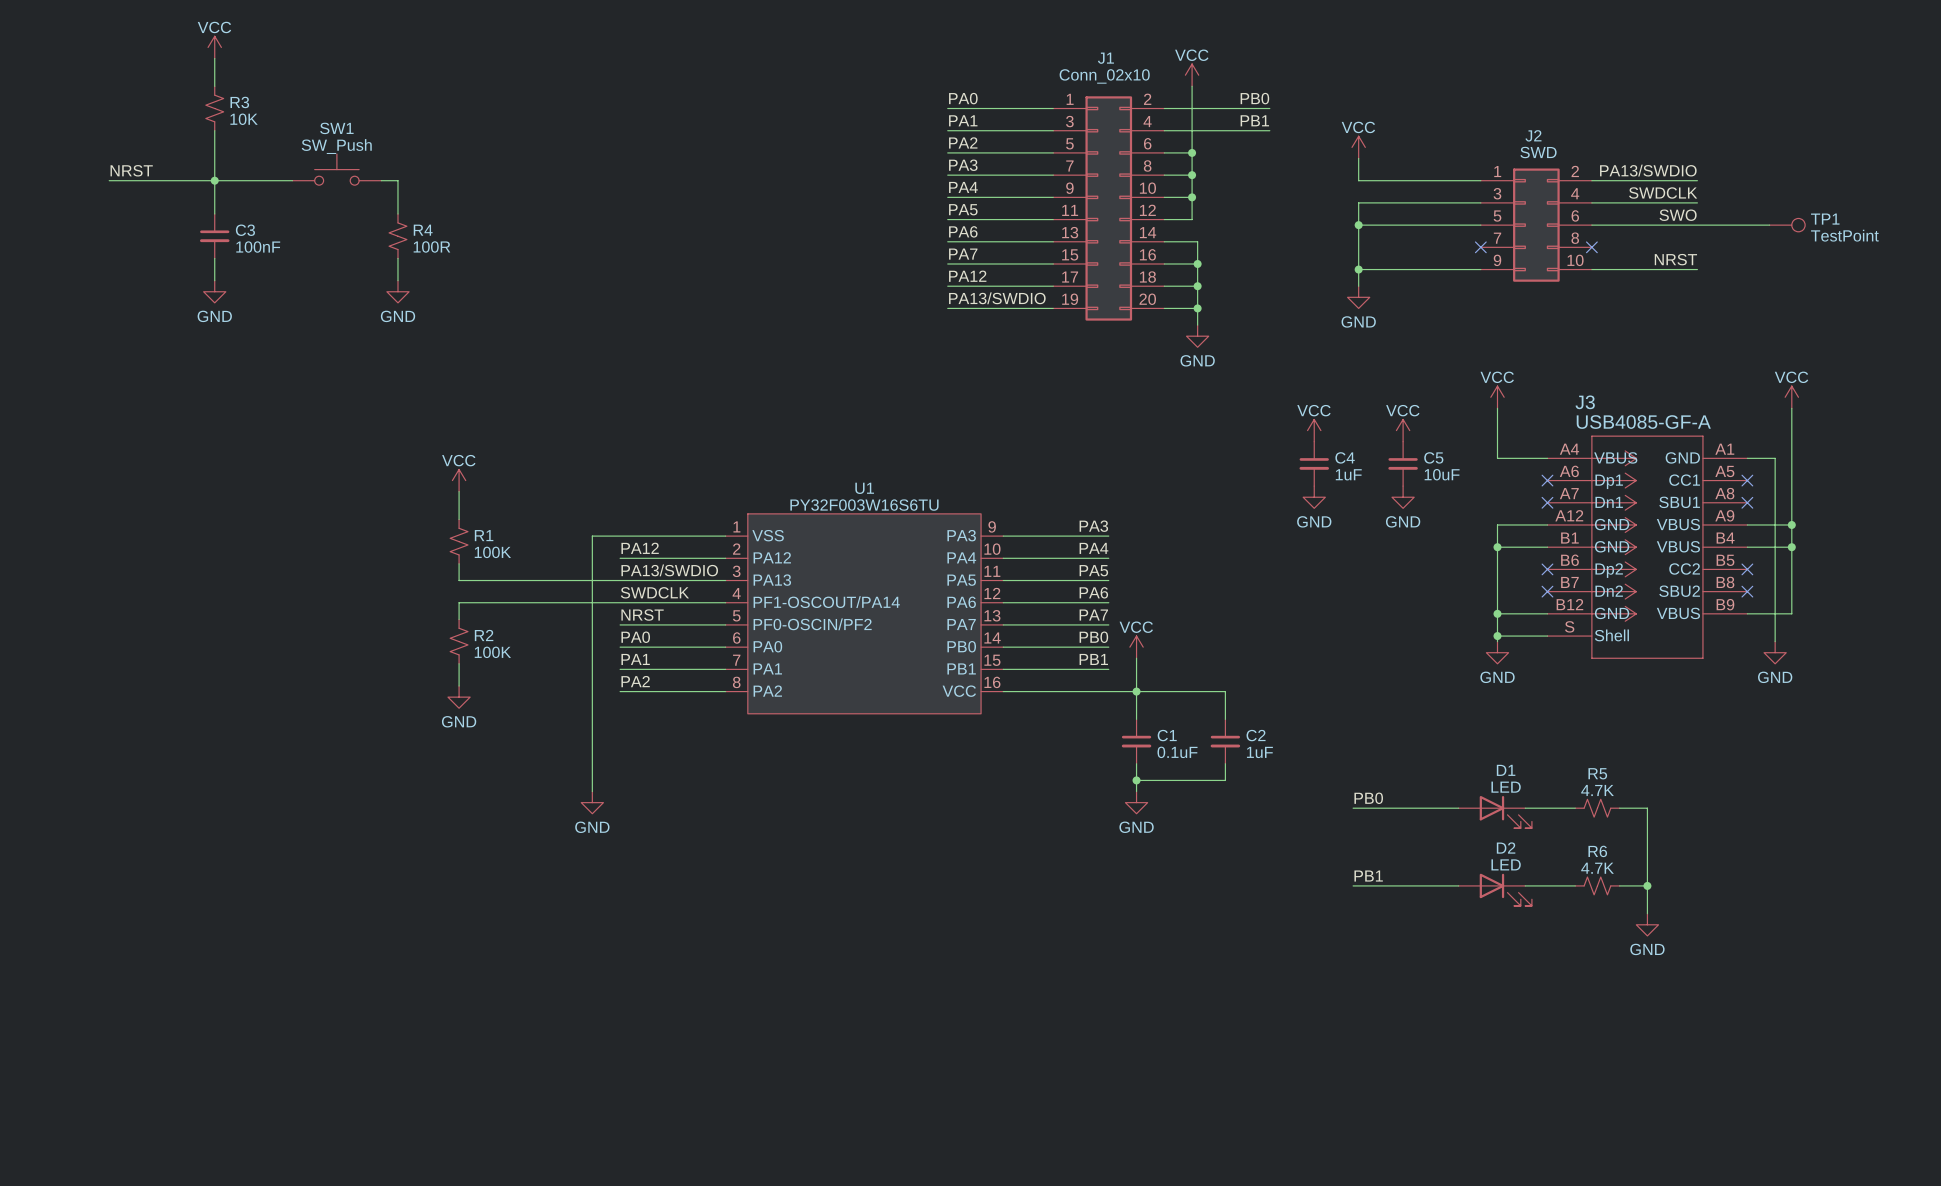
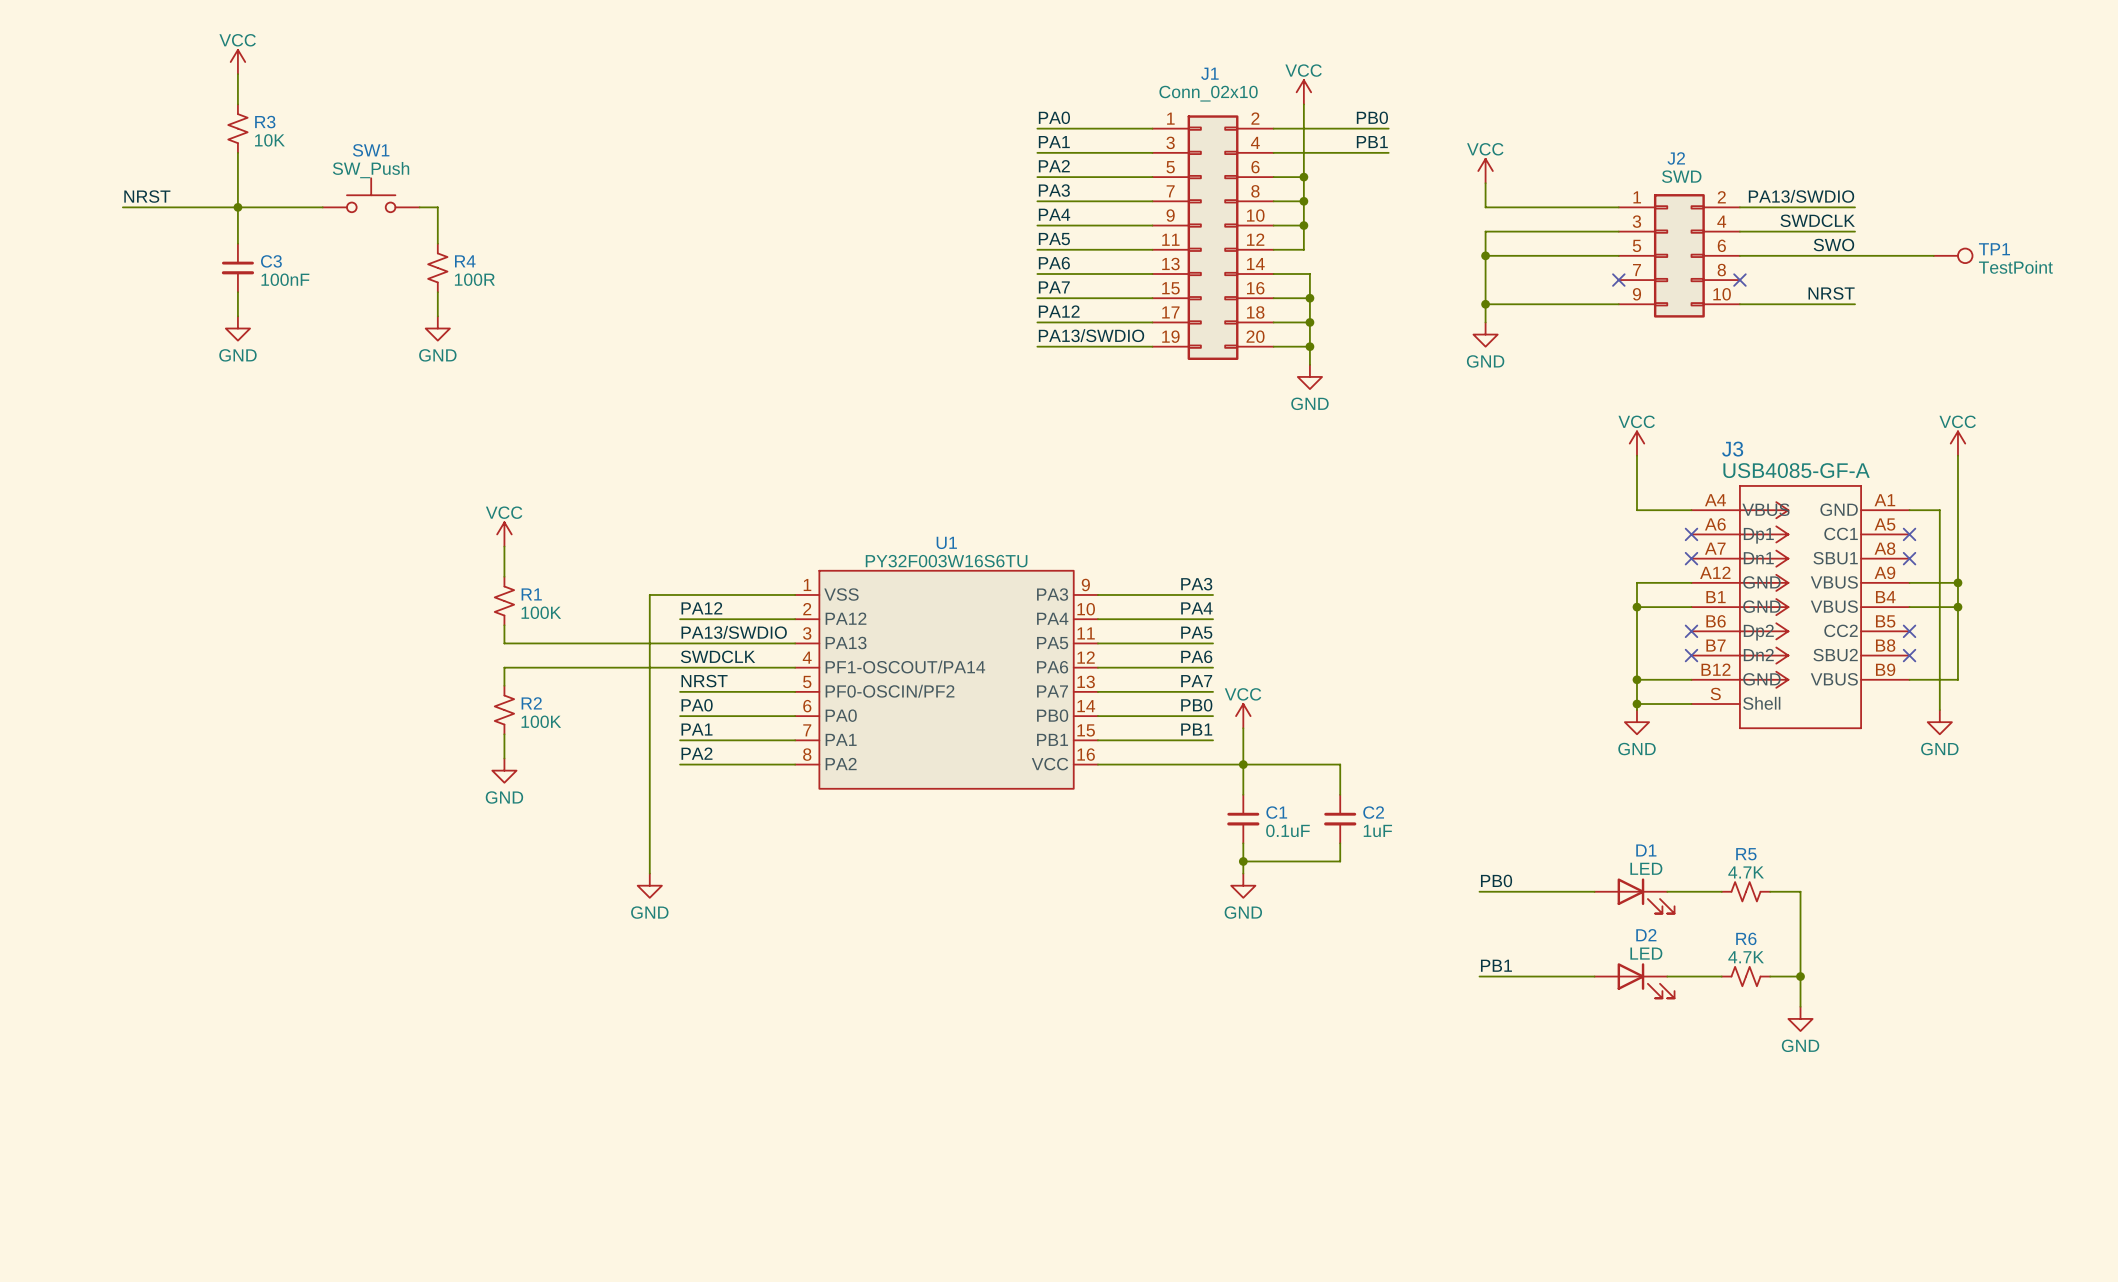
power symbol: VCC (1314, 430) -> none
power symbol: VCC (1403, 430) -> none
C4: 1uF (1314, 463) -> none
C5: 10uF (1403, 463) -> none
power symbol: GND (1314, 497) -> none
power symbol: GND (1403, 497) -> none

